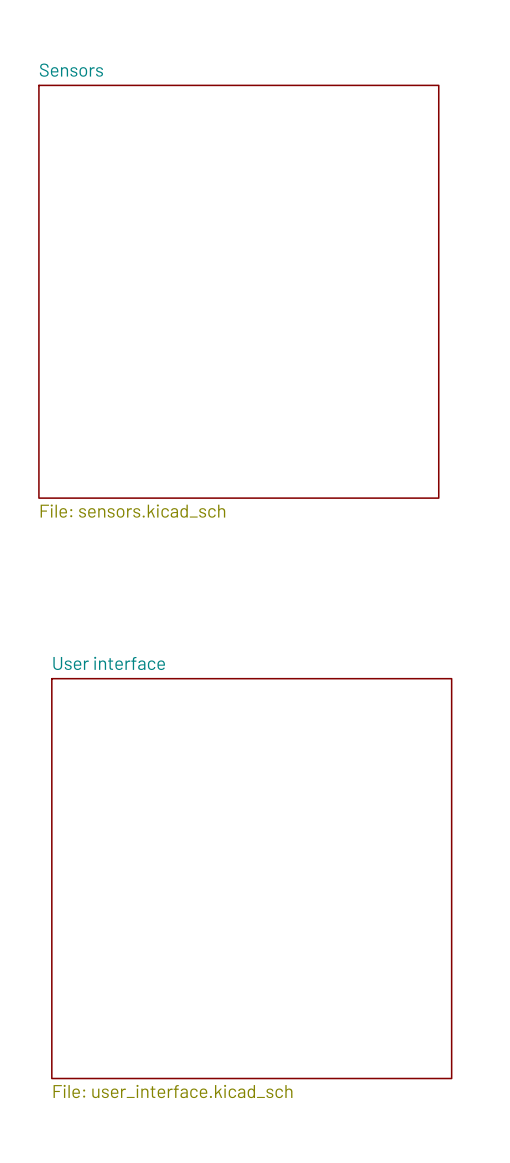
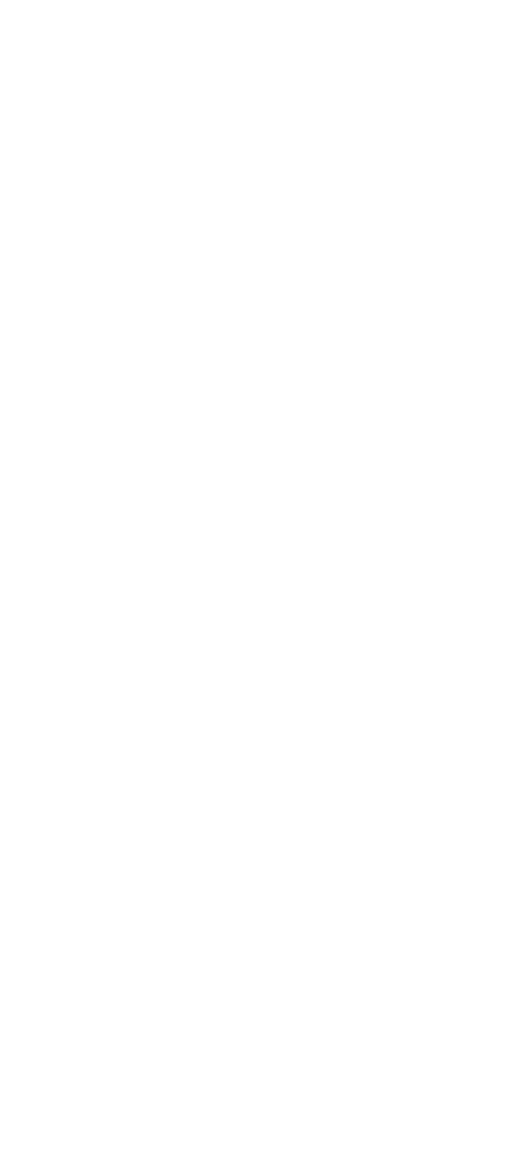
sheet Sensors: File: sensors.kicad_sch (238, 291) -> none
sheet User interface: File: user_interface.kicad_sch (251, 878) -> none

